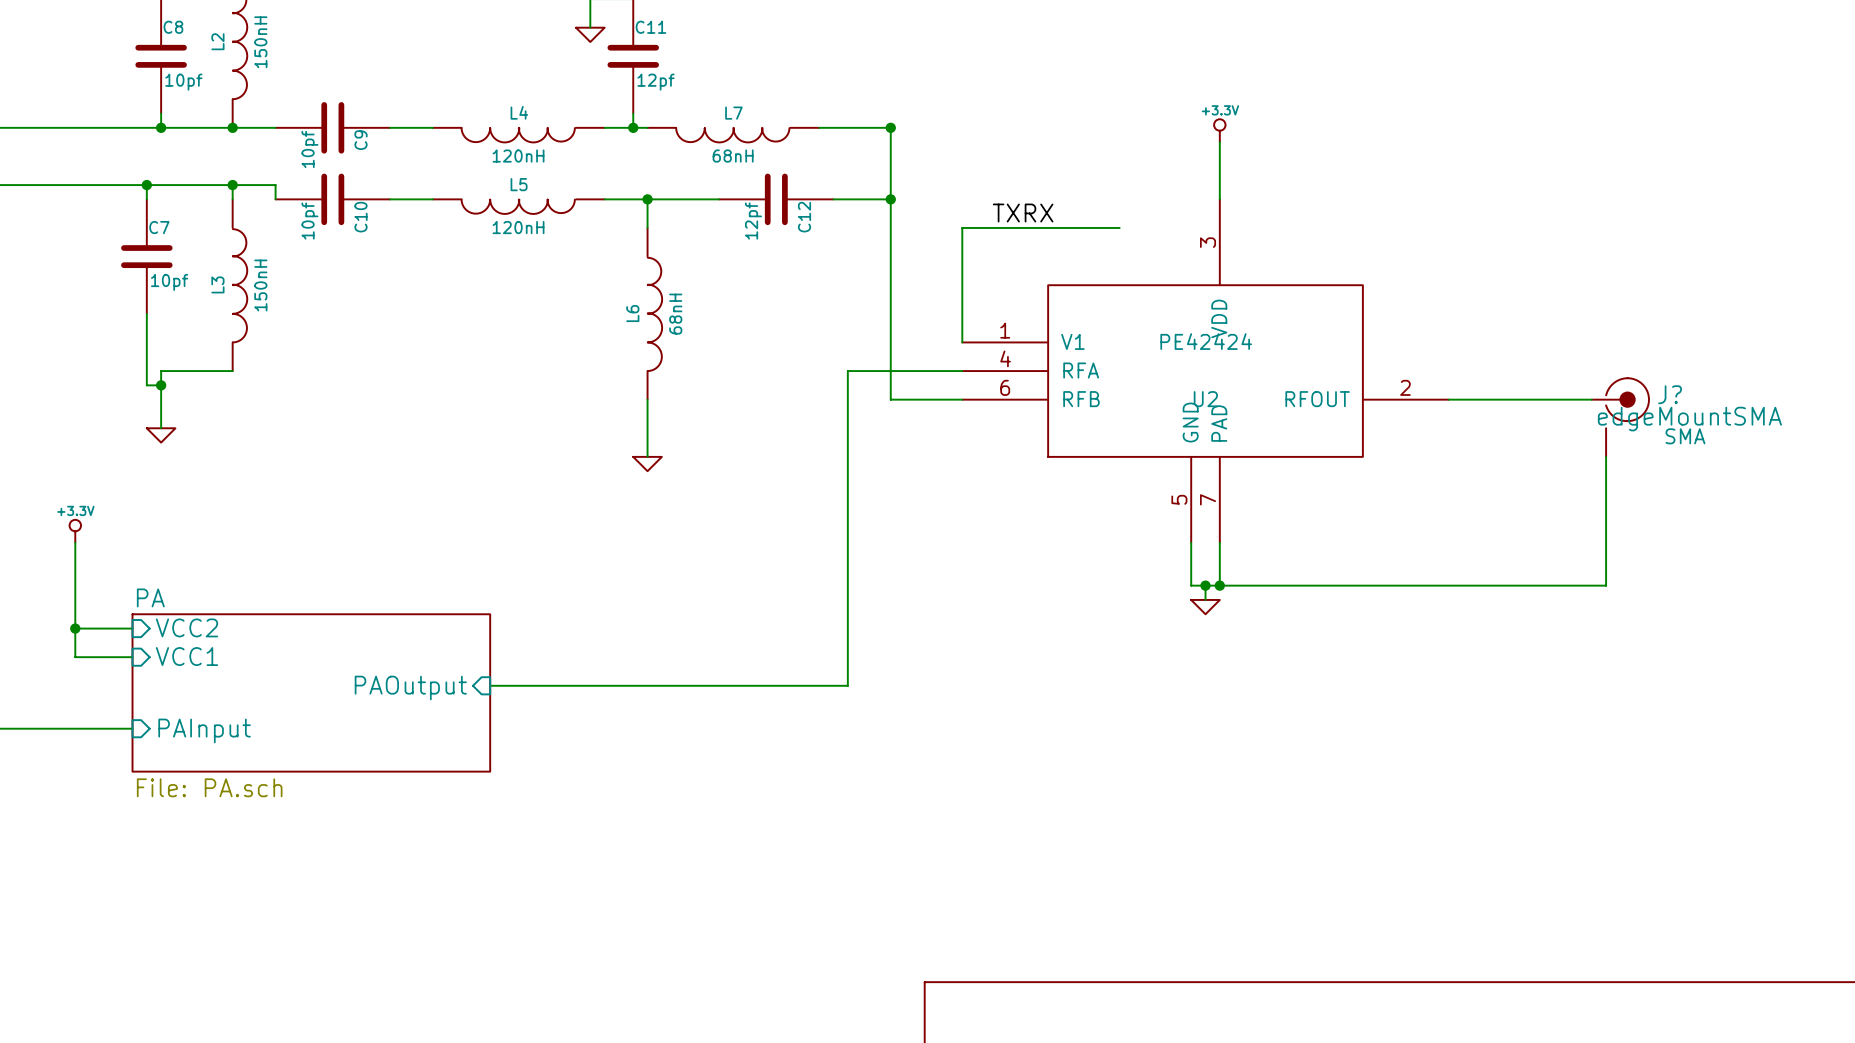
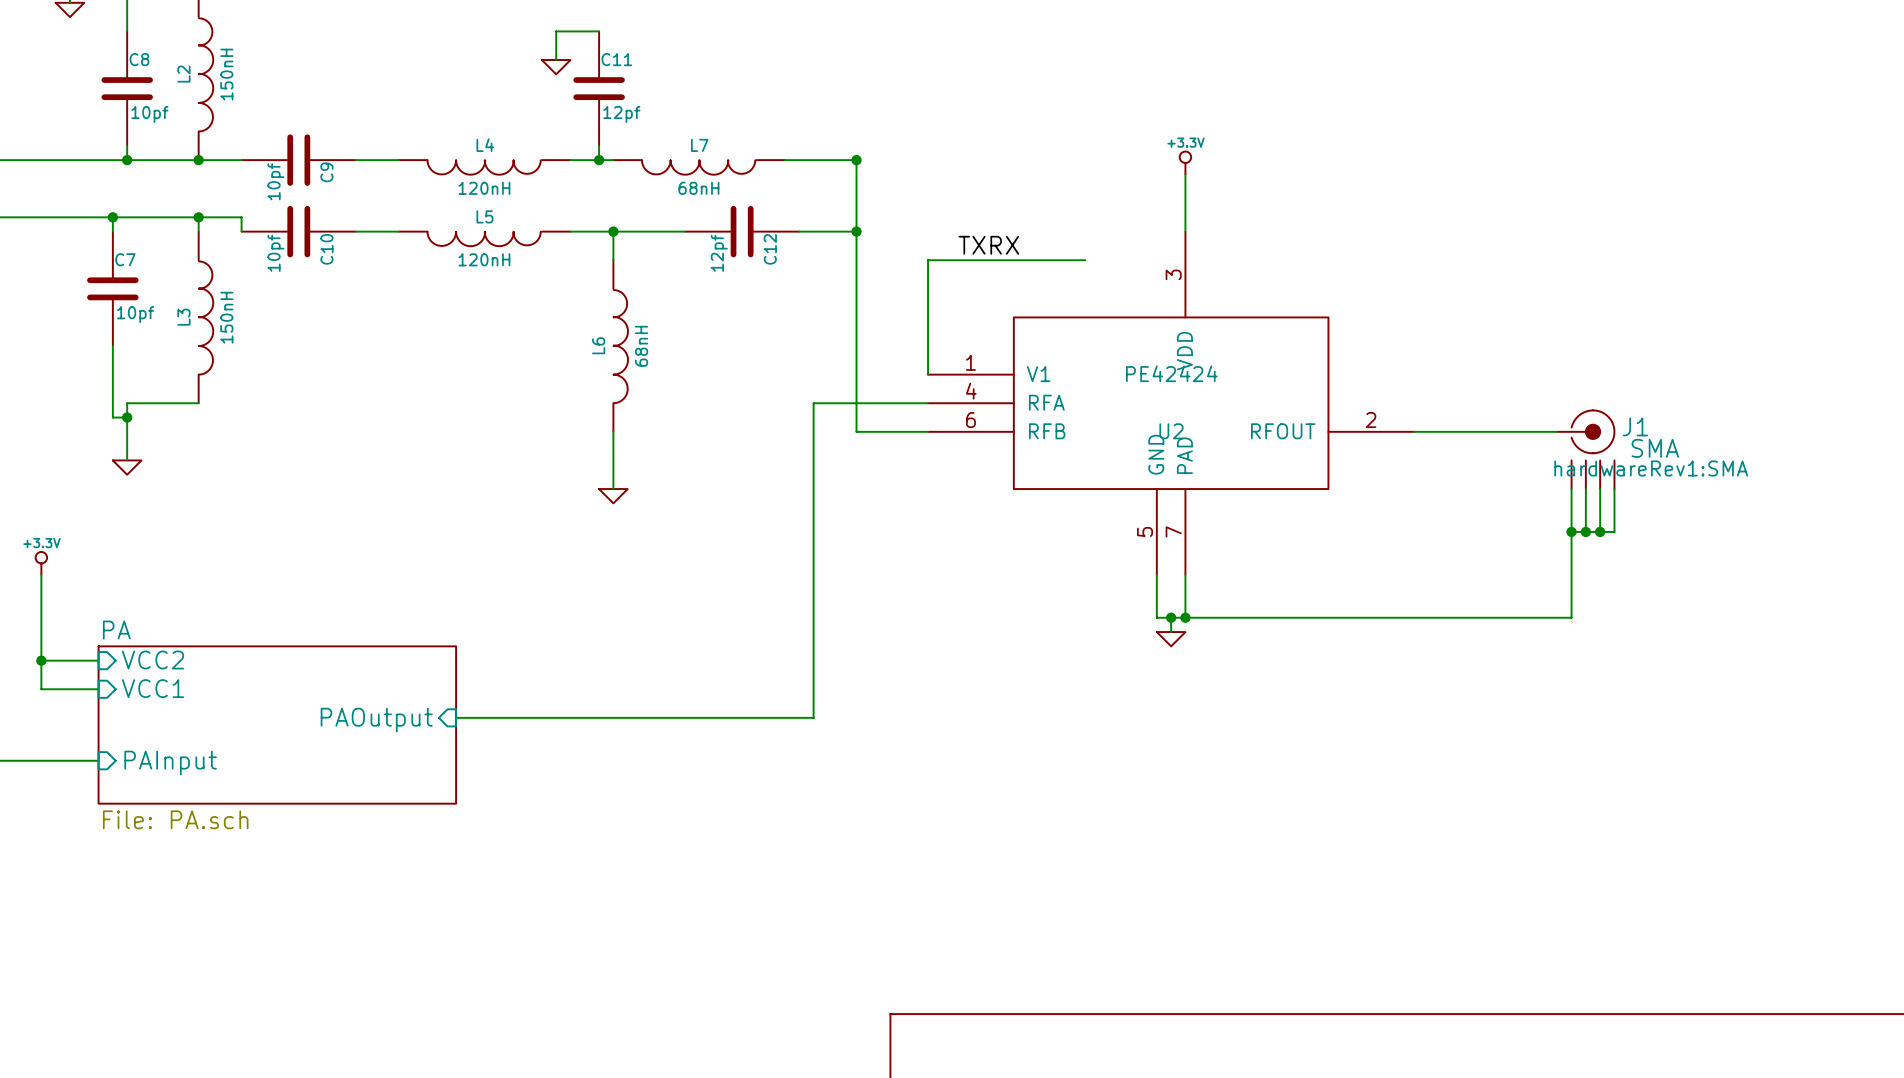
J?: edgeMountSMA (1620, 417) -> none
J1: none -> SMA (1585, 449)
wire: none -> (1585, 489) (1585, 531)
wire: none -> (1600, 489) (1600, 531)
wire: none -> (1614, 489) (1614, 531) (1571, 531)
junction: none -> (1571, 531)
junction: none -> (1585, 531)
junction: none -> (1600, 531)

